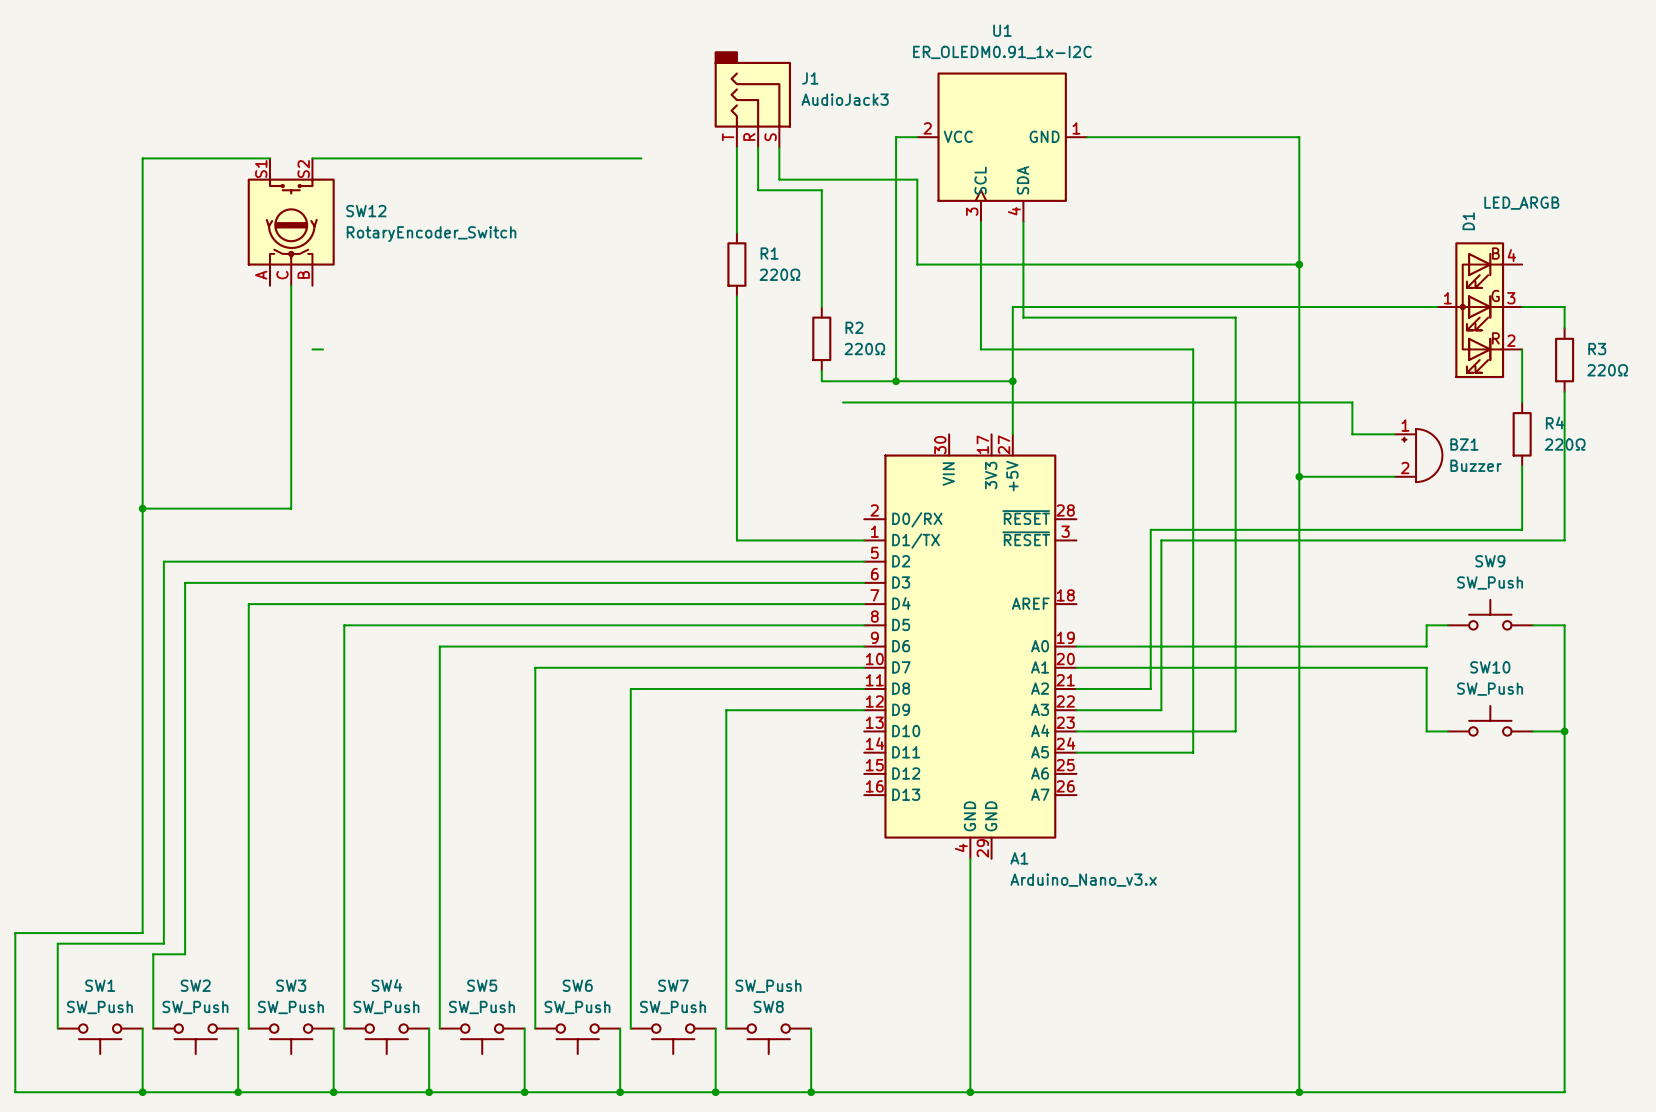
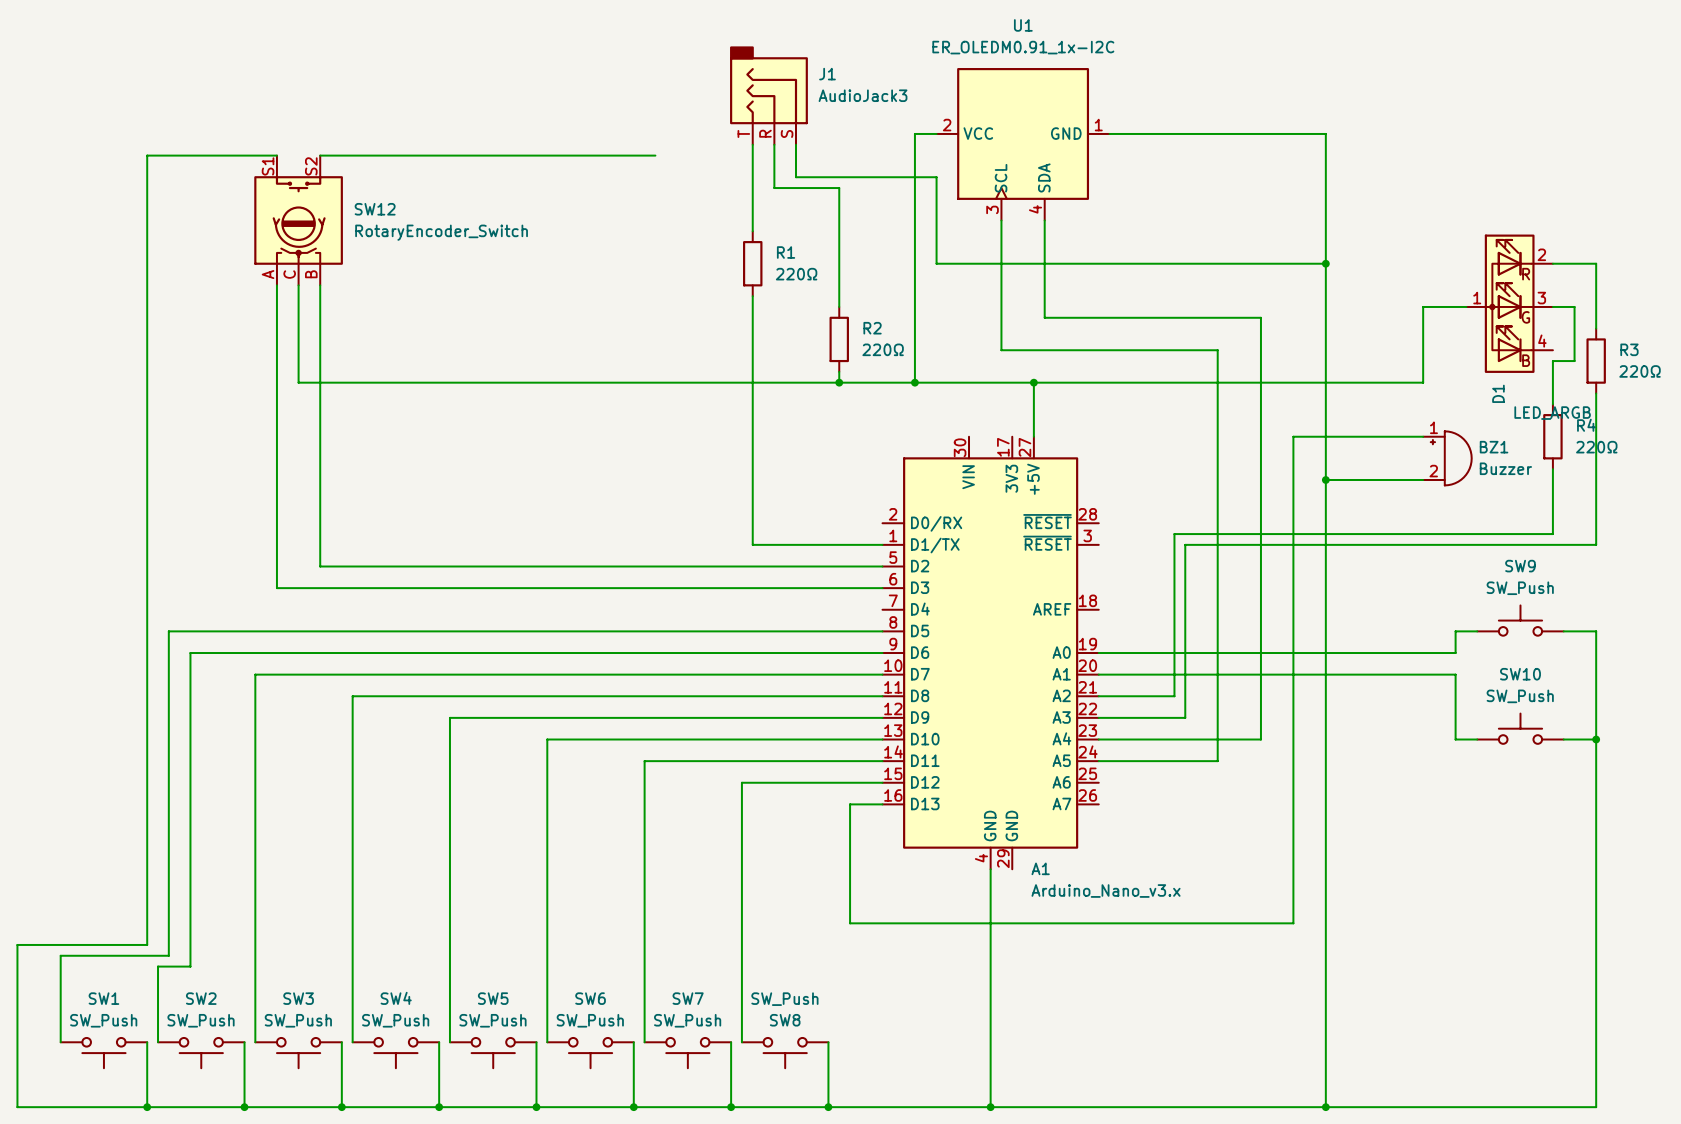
wire: none -> (276, 285) (276, 588)
wire: none -> (320, 285) (320, 566)
wire: (1394, 306) (1012, 306) (1012, 381) -> (1423, 306) (1423, 382) (1033, 382)
wire: (1543, 306) (1564, 306) -> (1552, 263) (1596, 263) (1596, 306)
D1 flip: as is (1479, 310) -> up-down (1509, 303)
wire: (312, 349) (323, 349) -> none
wire: (1522, 349) (1522, 360) -> (1574, 306) (1574, 361) (1552, 361)
wire: (291, 381) (291, 508) (142, 508) -> (298, 382) (839, 382)
junction: none -> (839, 382)
wire: (843, 402) (1352, 402) (1352, 434) -> (882, 804) (850, 804) (850, 923) (1293, 923) (1293, 436) (1379, 436)
junction: (142, 508) -> none
wire: (312, 561) (163, 561) (163, 625) -> (352, 631) (168, 631)
wire: (269, 582) (185, 582) (185, 646) -> (449, 653) (190, 653)
wire: (864, 604) (248, 604) (248, 667) -> none
wire: (344, 625) (344, 689) -> (644, 696) (352, 696)
wire: (439, 646) (439, 710) -> (741, 717) (449, 717)
wire: (535, 667) (535, 731) -> (547, 674) (255, 674)
wire: (630, 689) (630, 752) -> (882, 761) (644, 761)
wire: (726, 710) (726, 773) -> (882, 782) (741, 782)
wire: none -> (547, 739) (882, 739)

